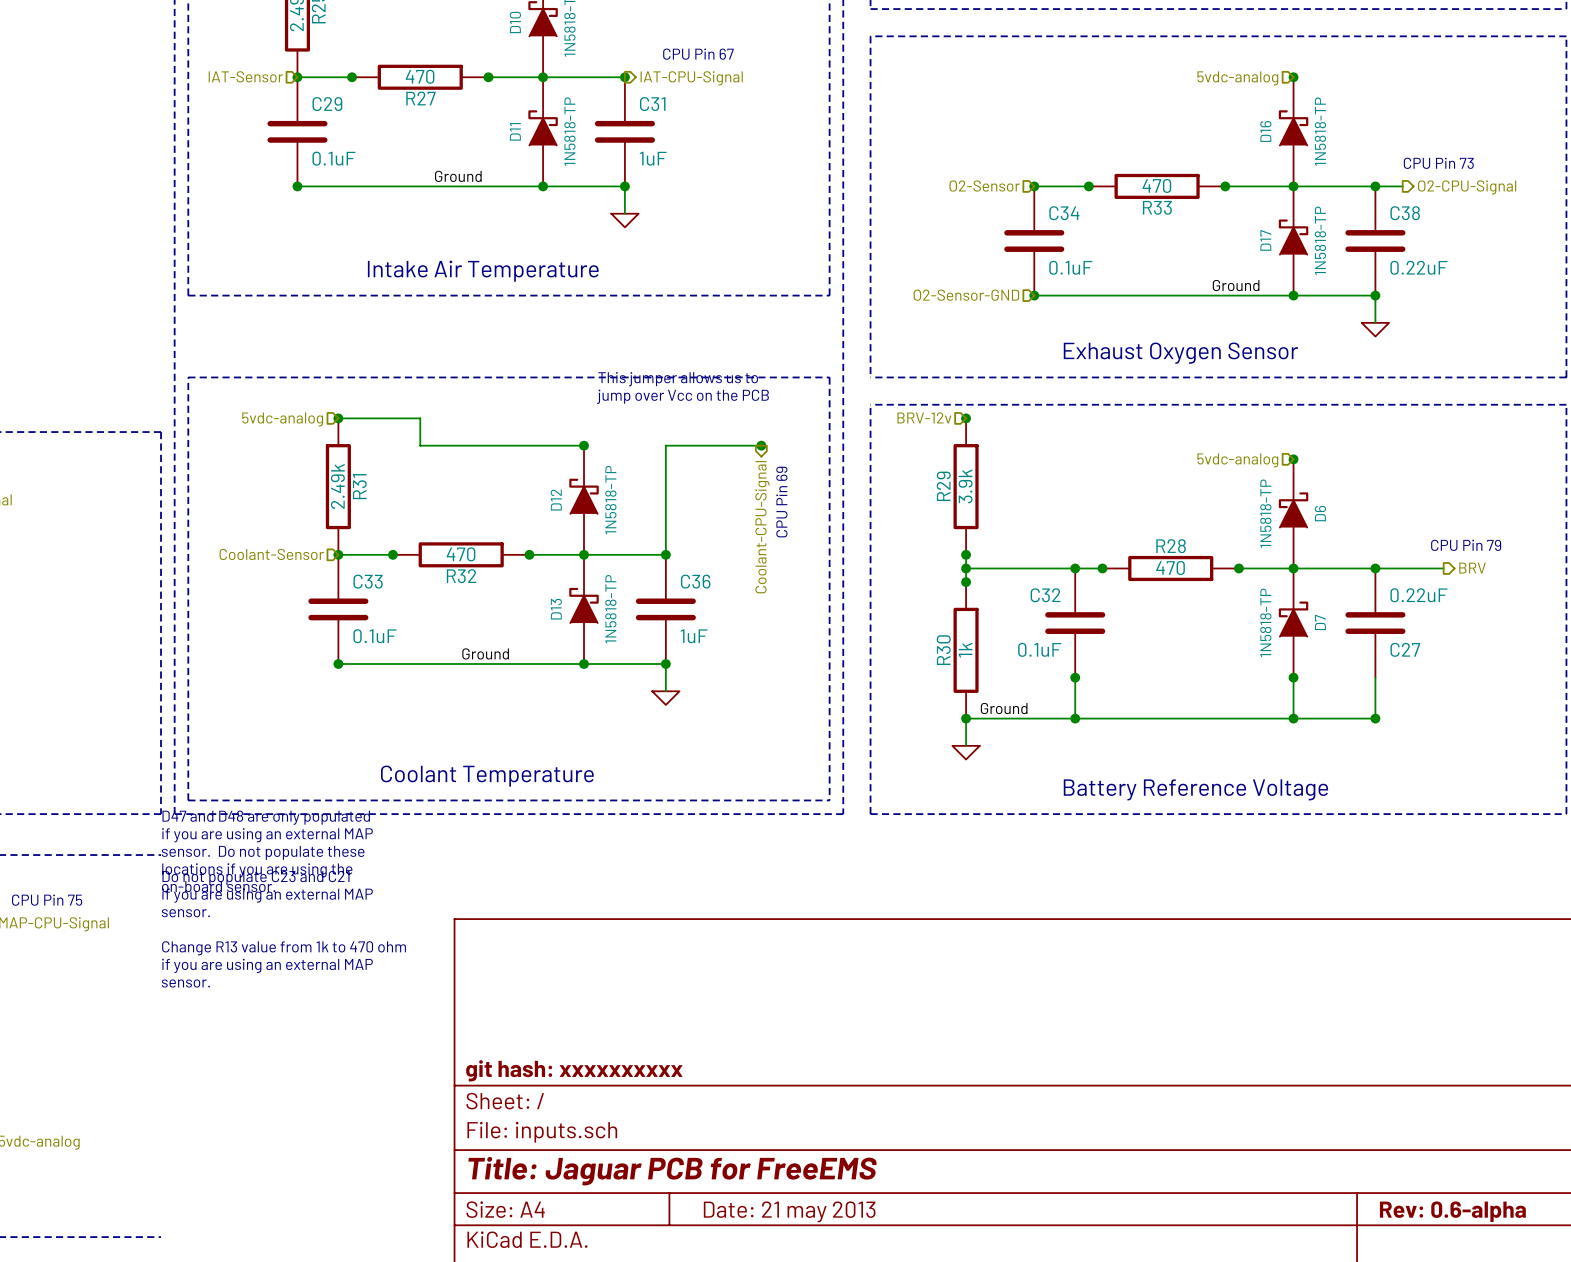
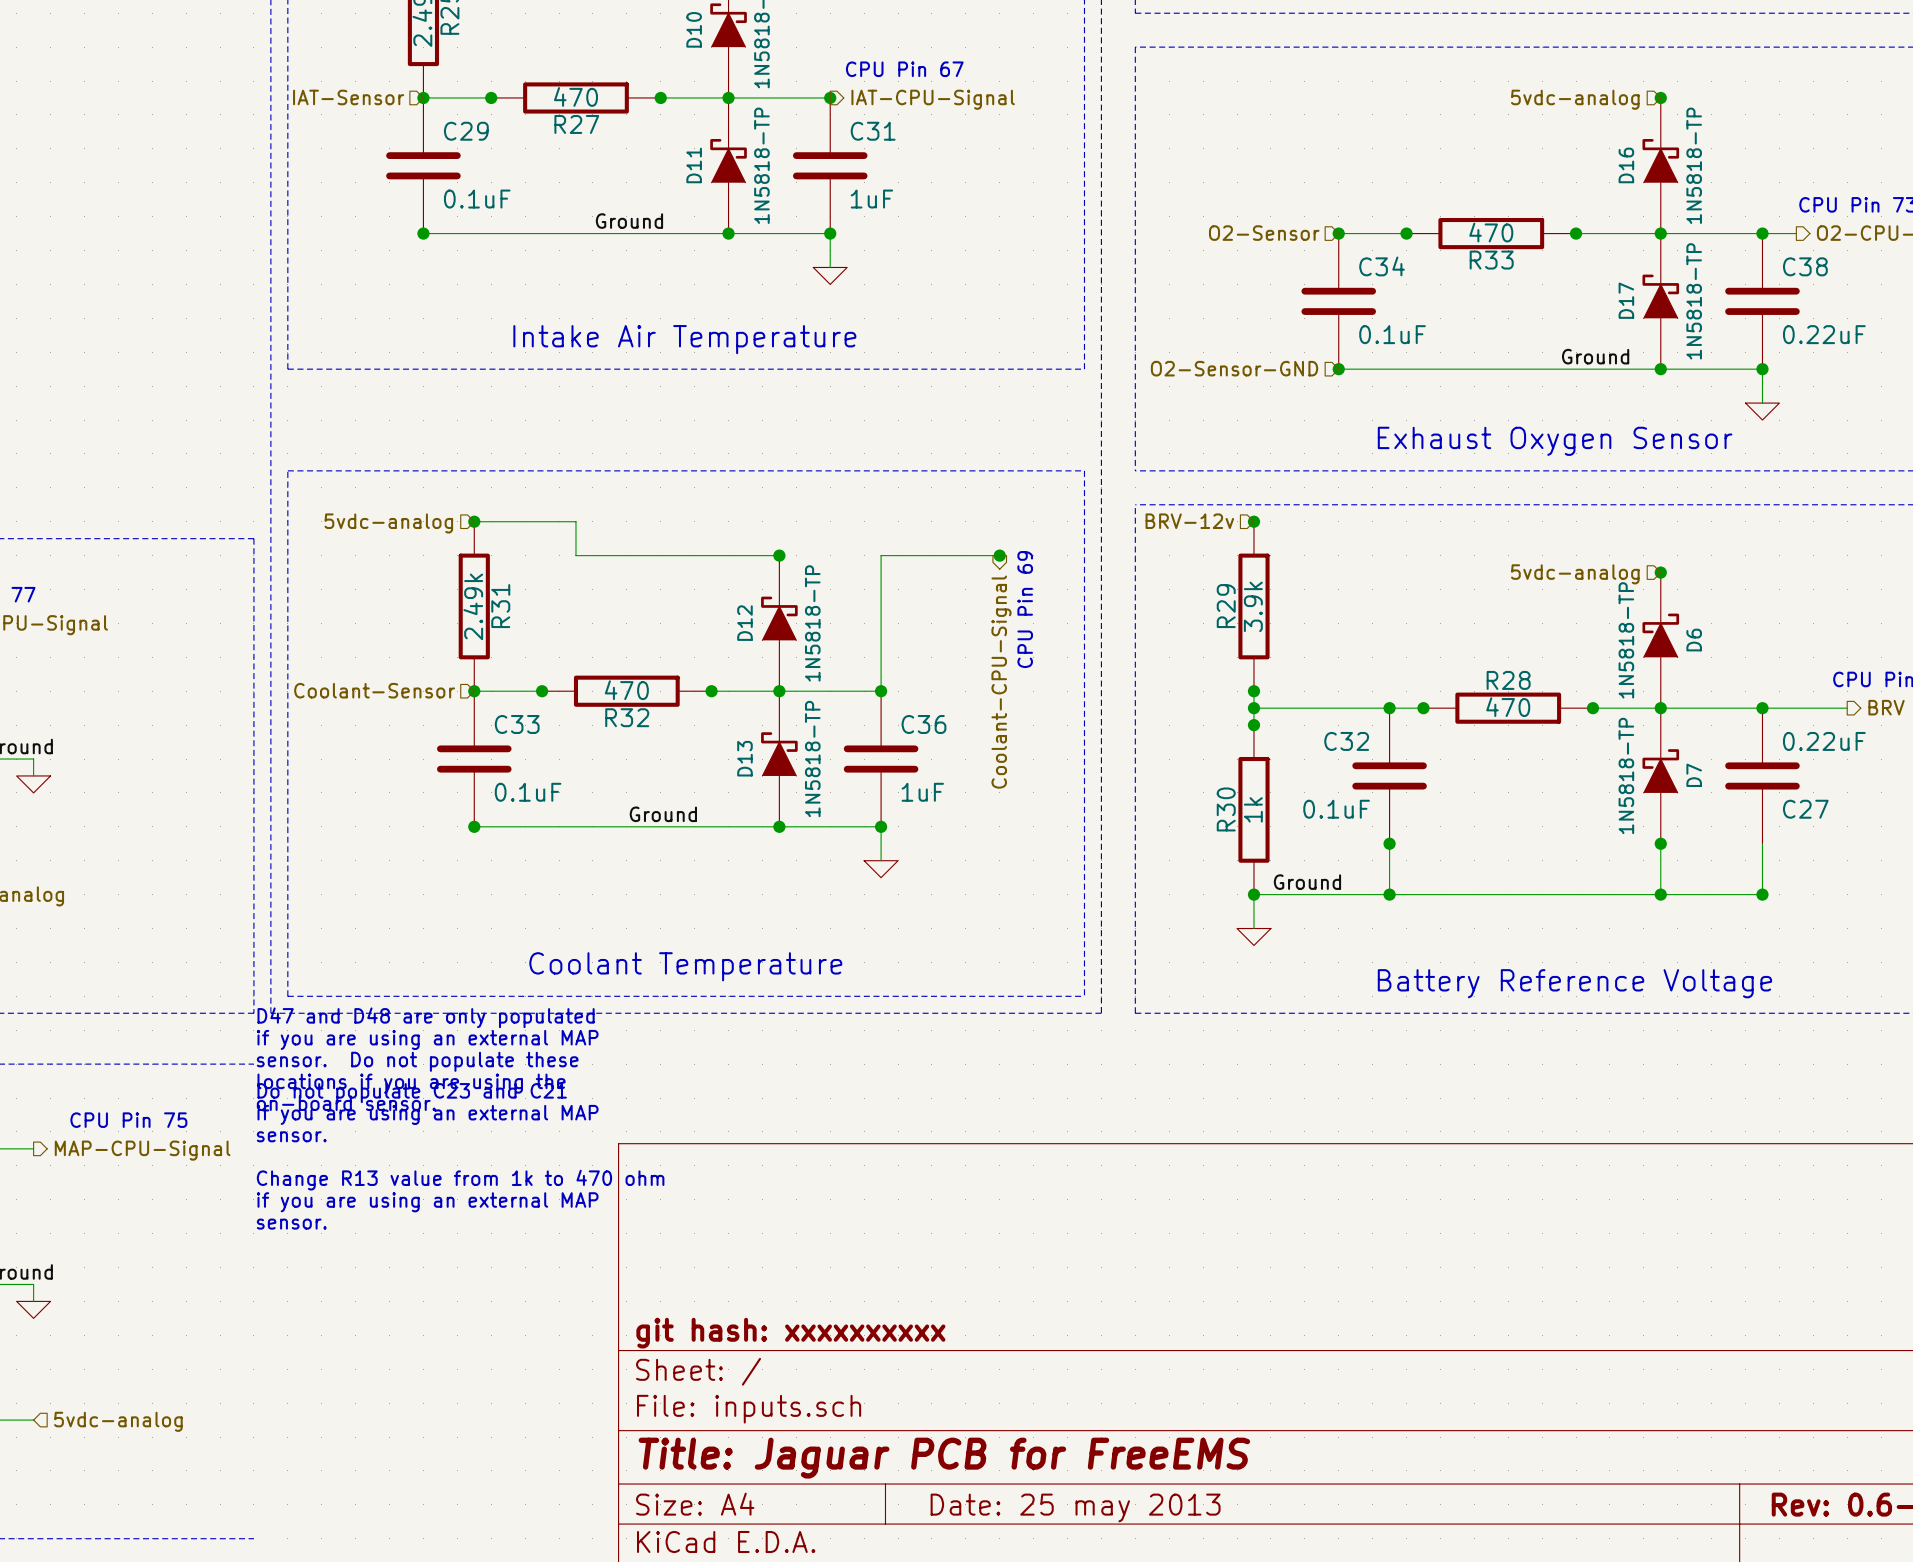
text: This jumper allows us to (678, 379) -> none
text: jump over Vcc on the PCB (682, 396) -> none
title block: Date: 21 may 2013 (789, 1211) -> Date: 25 may 2013 (1075, 1507)

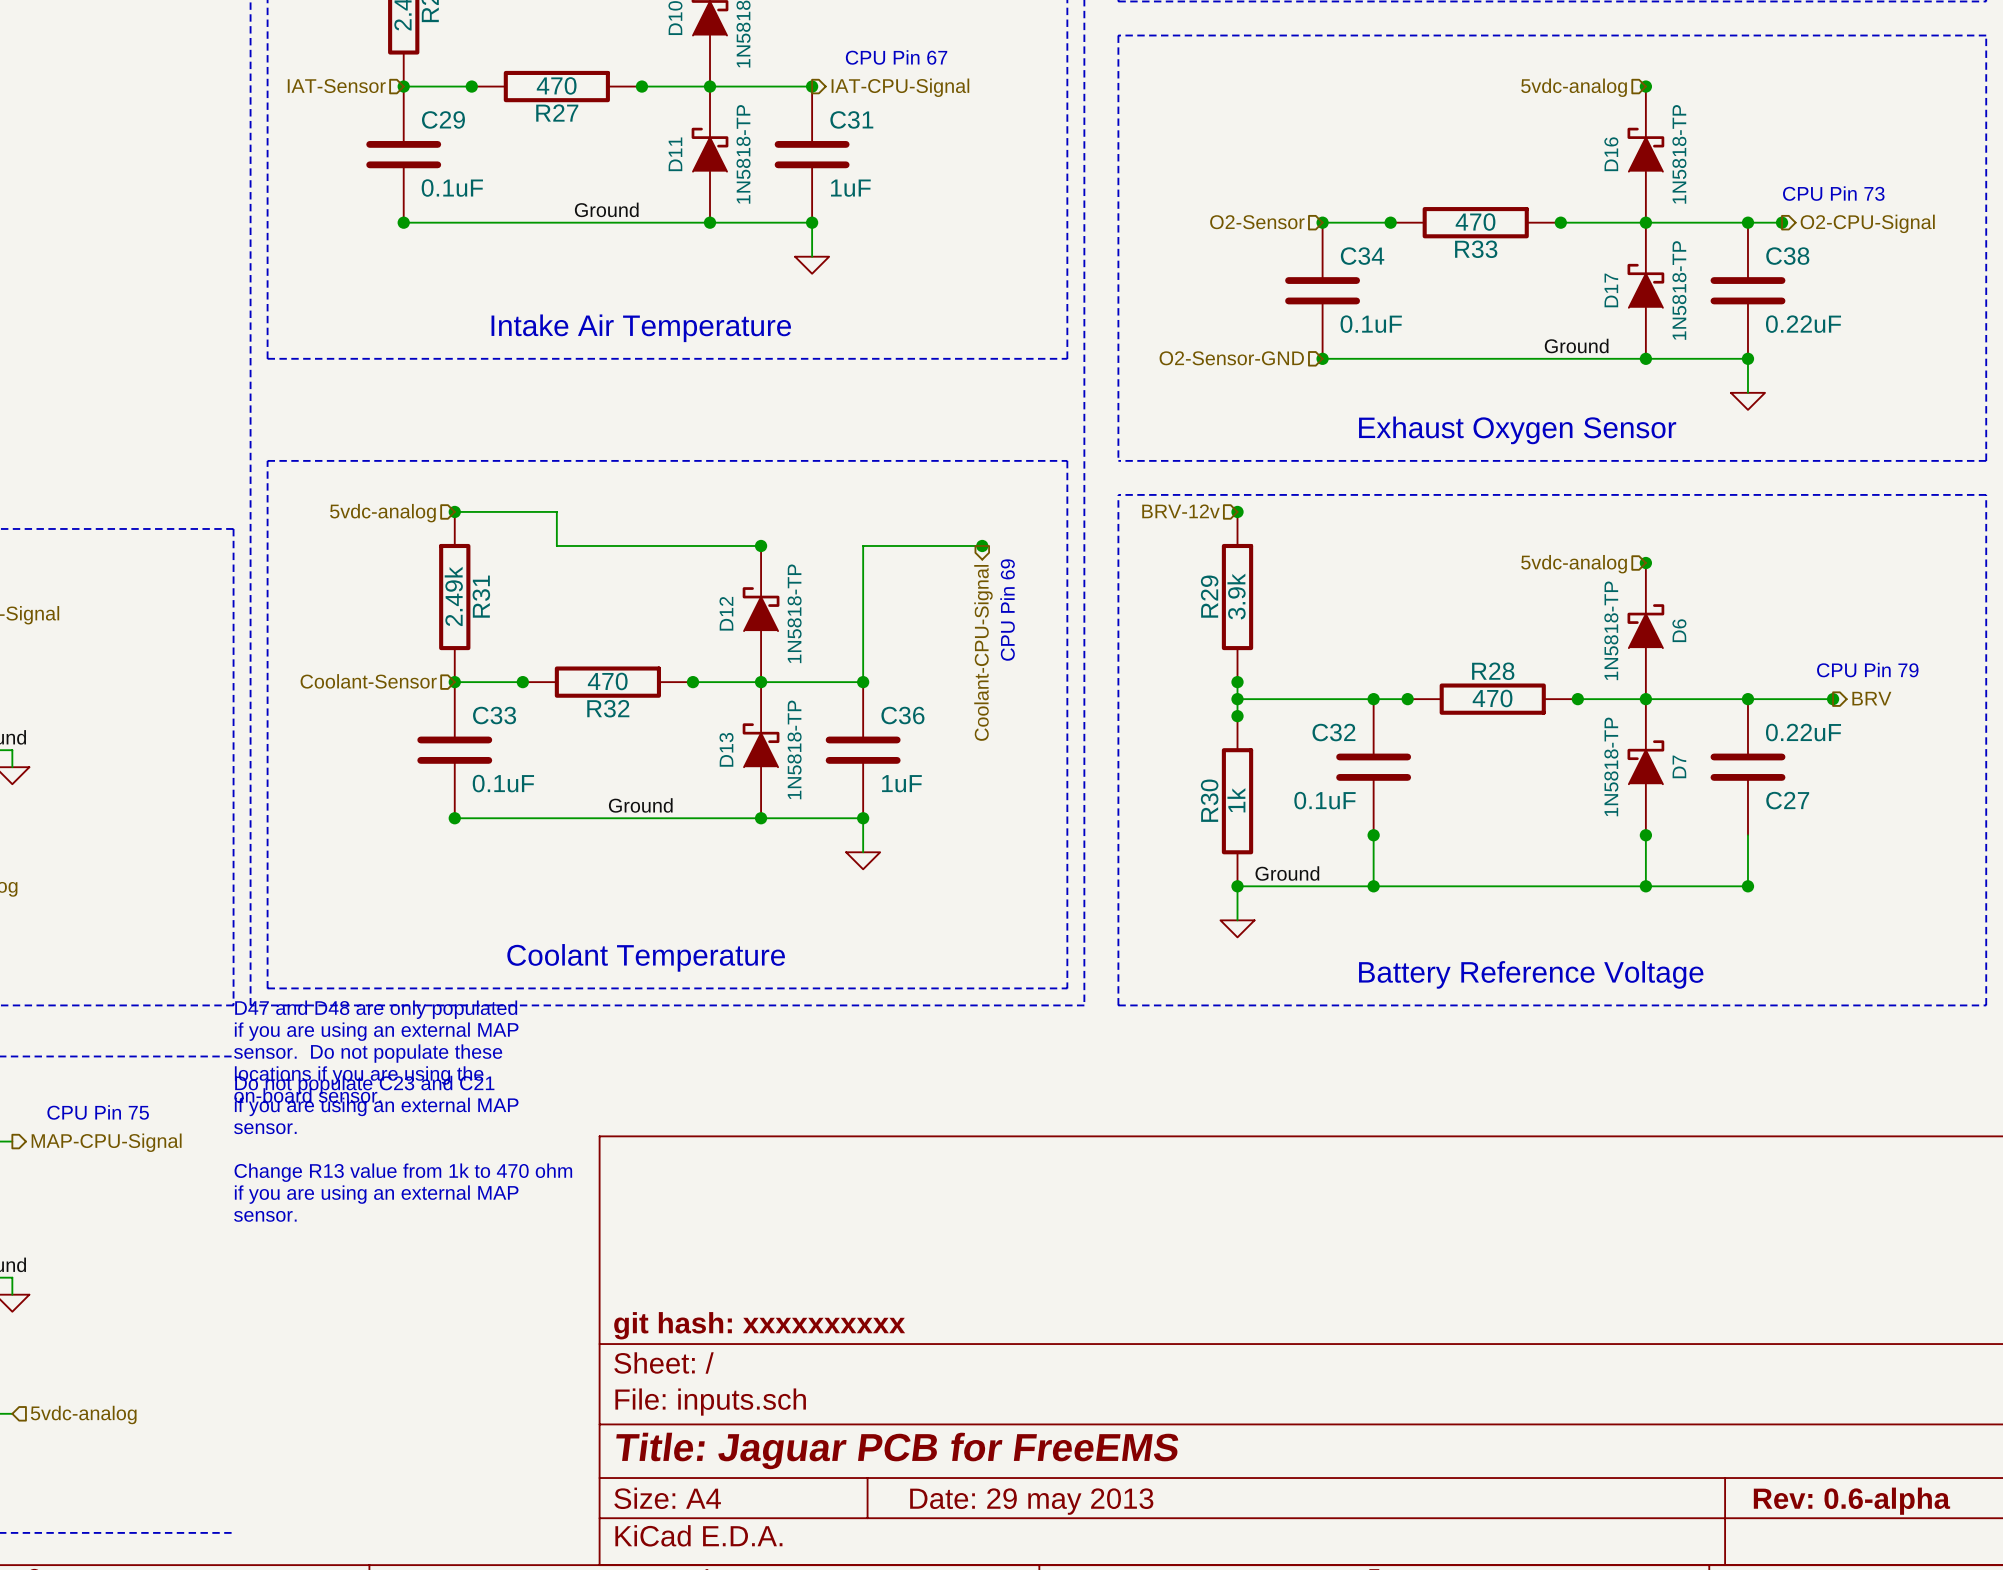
junction: none -> (1782, 222)
junction: none -> (1833, 699)
title block: Date: 25 may 2013 (1075, 1507) -> Date: 29 may 2013 (1031, 1501)

